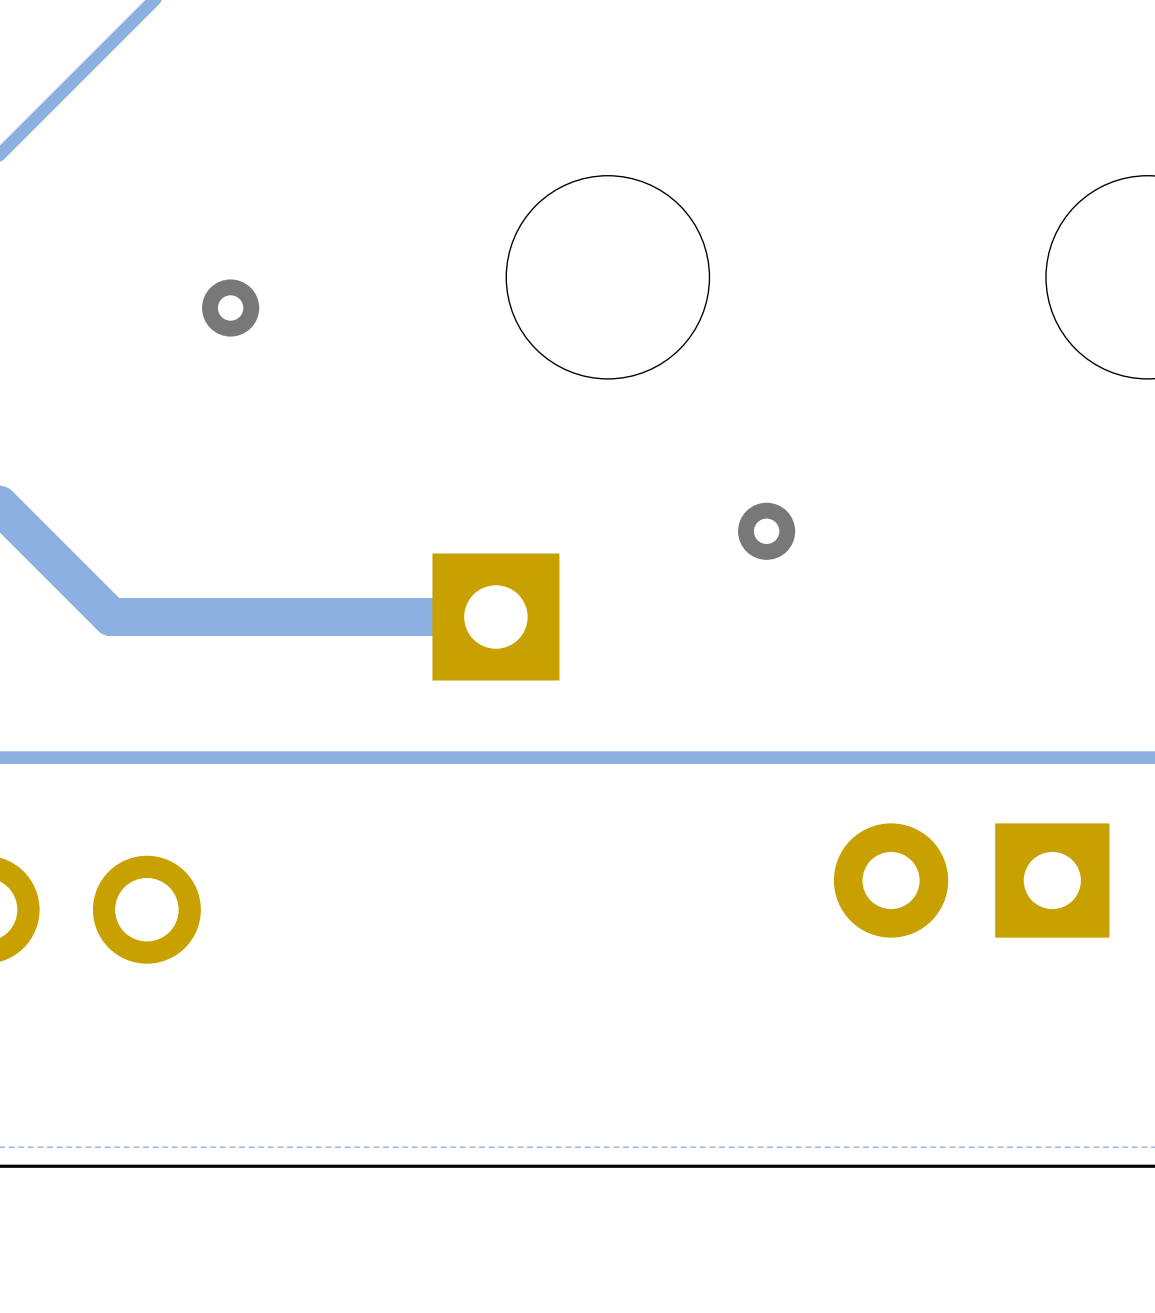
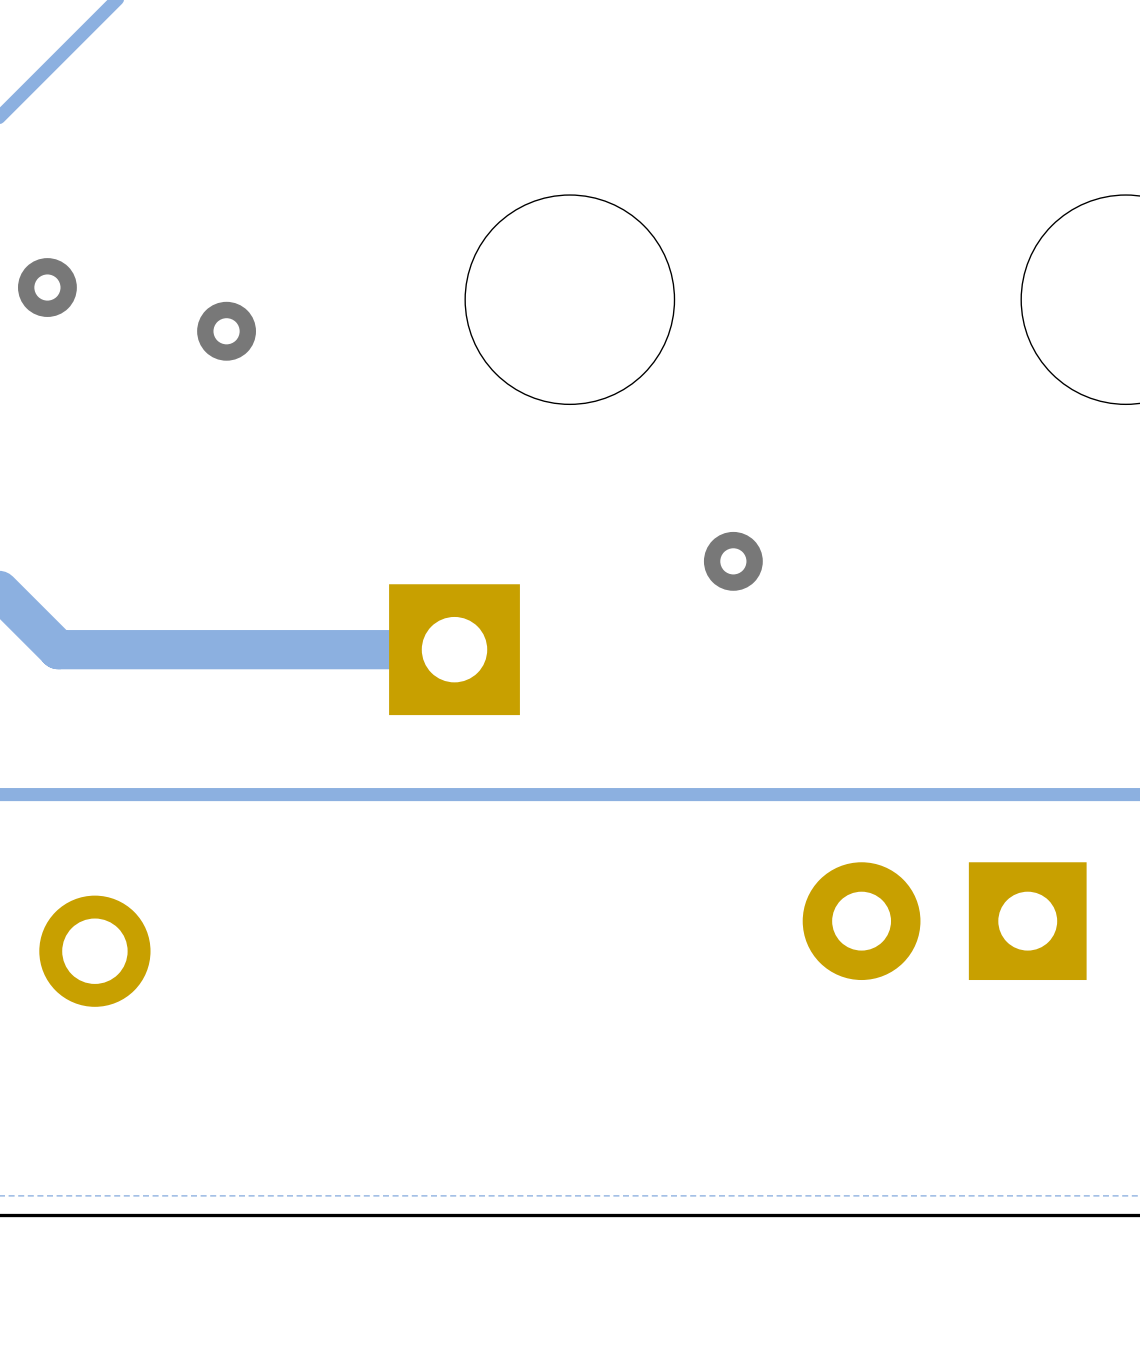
via: none -> (47, 287)
via position: (230, 308) -> (226, 331)

